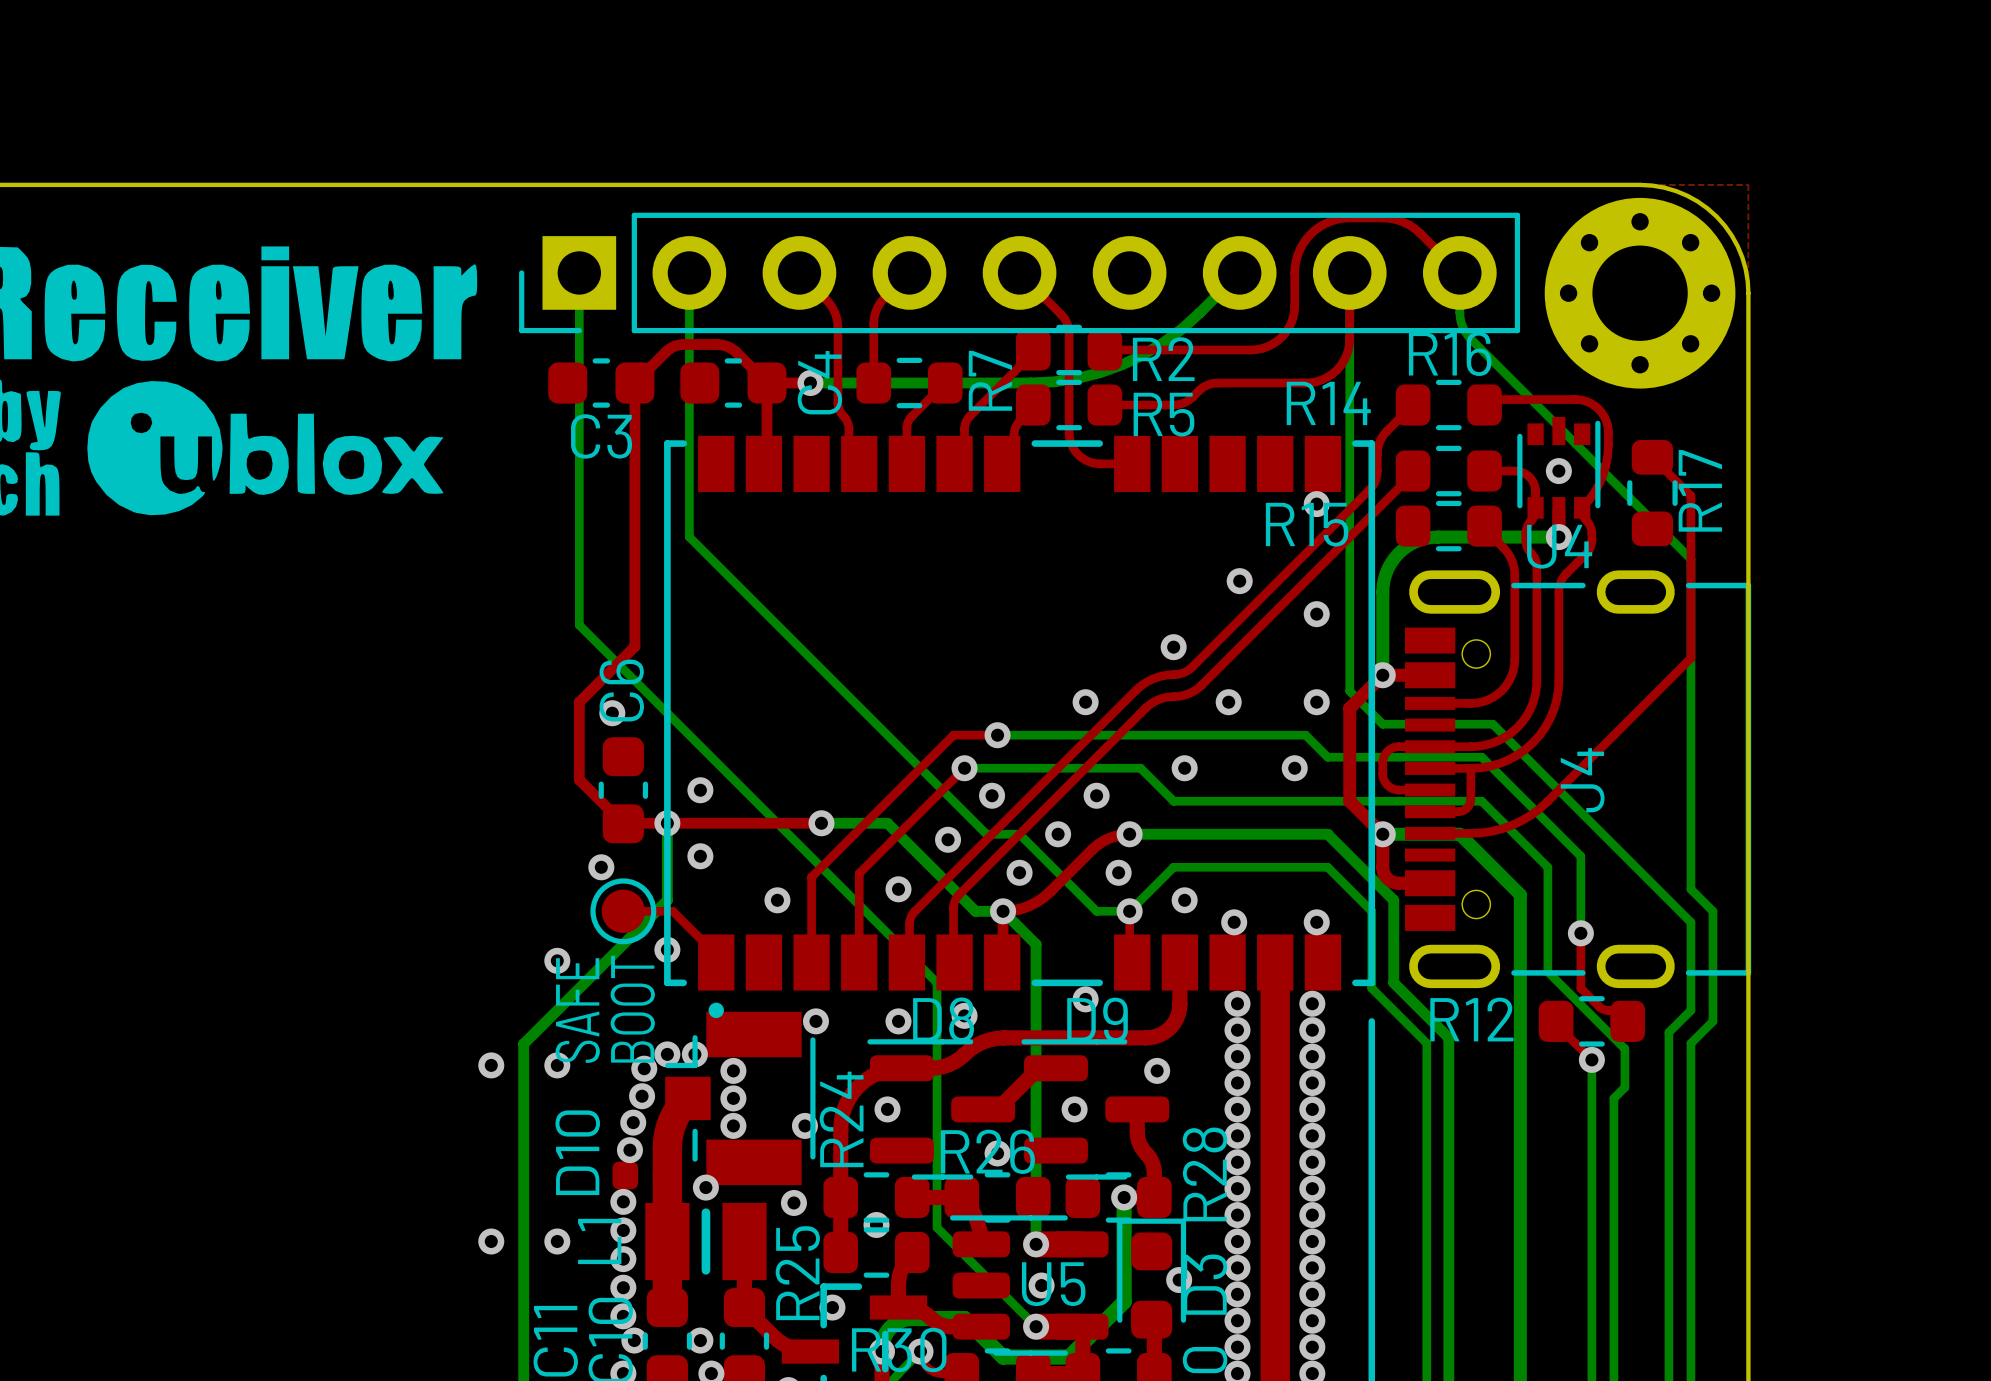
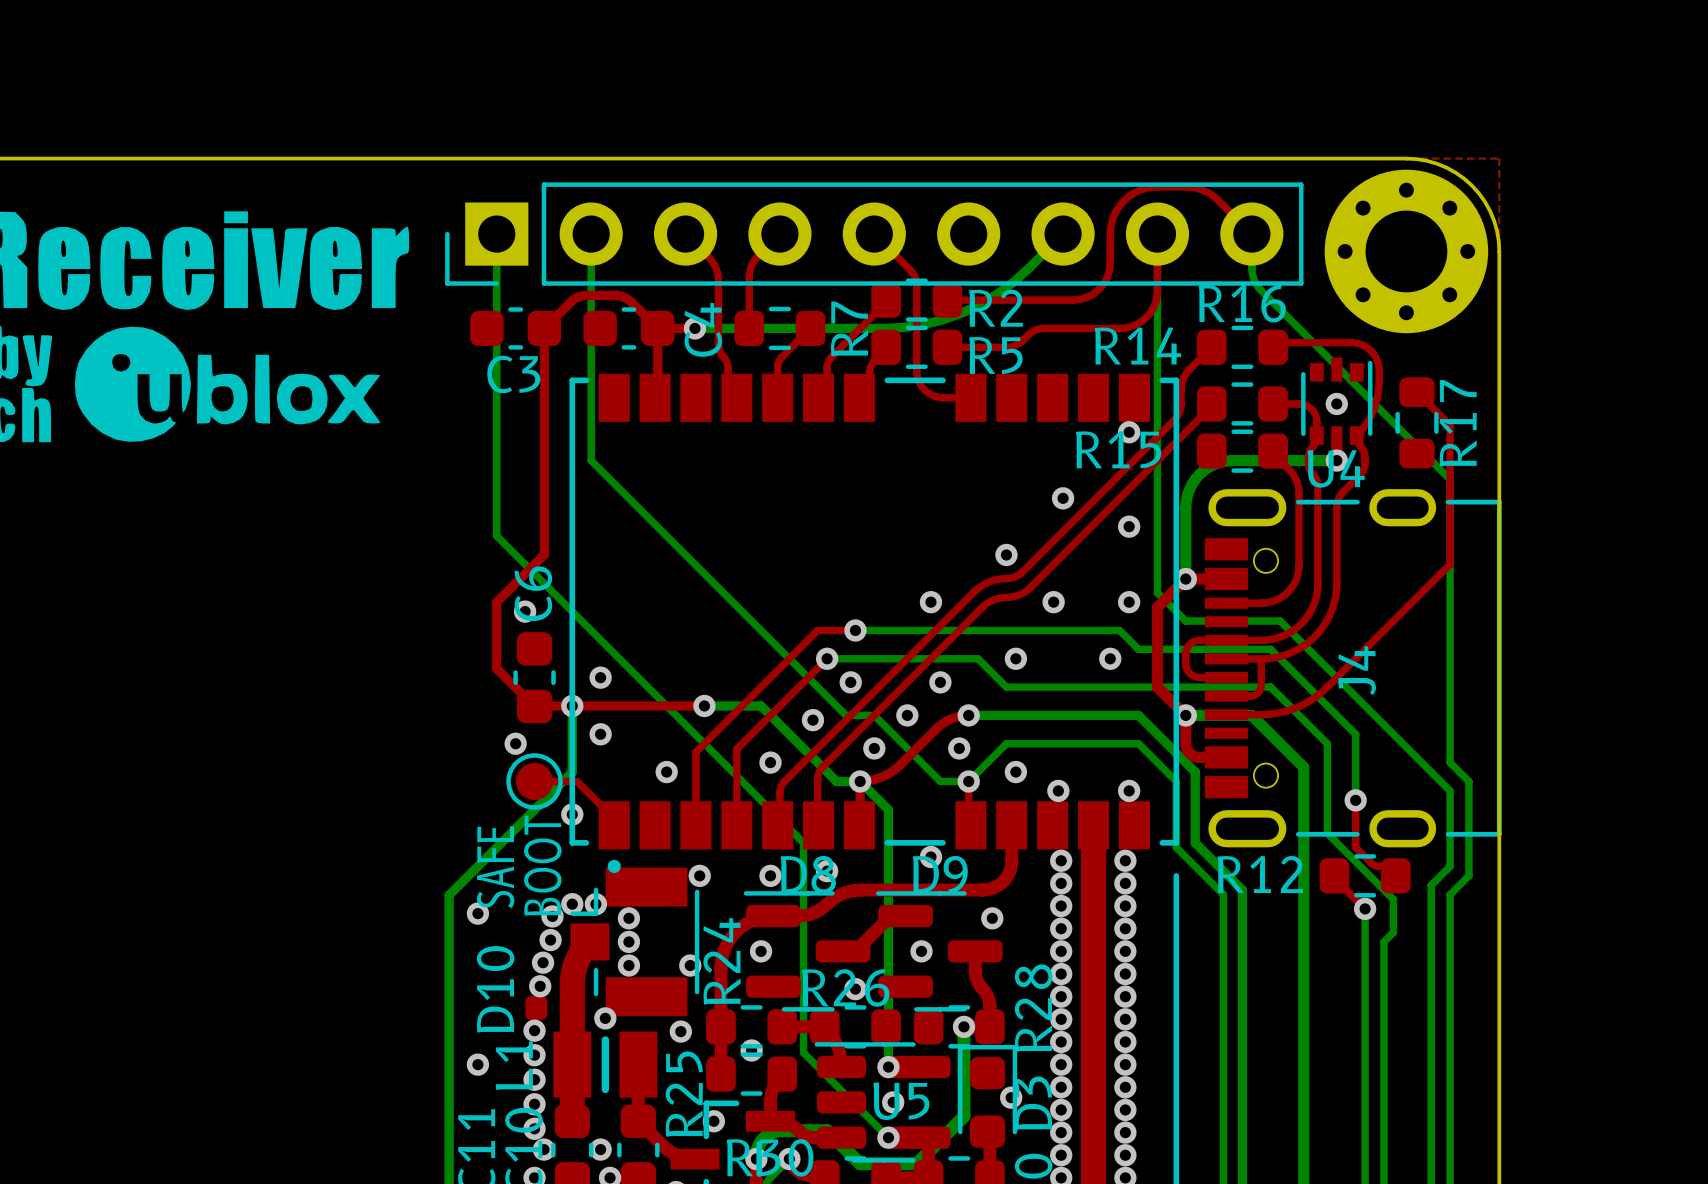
via: (557, 960) -> none
via: (491, 1065) -> none
via: (491, 1241) -> none

